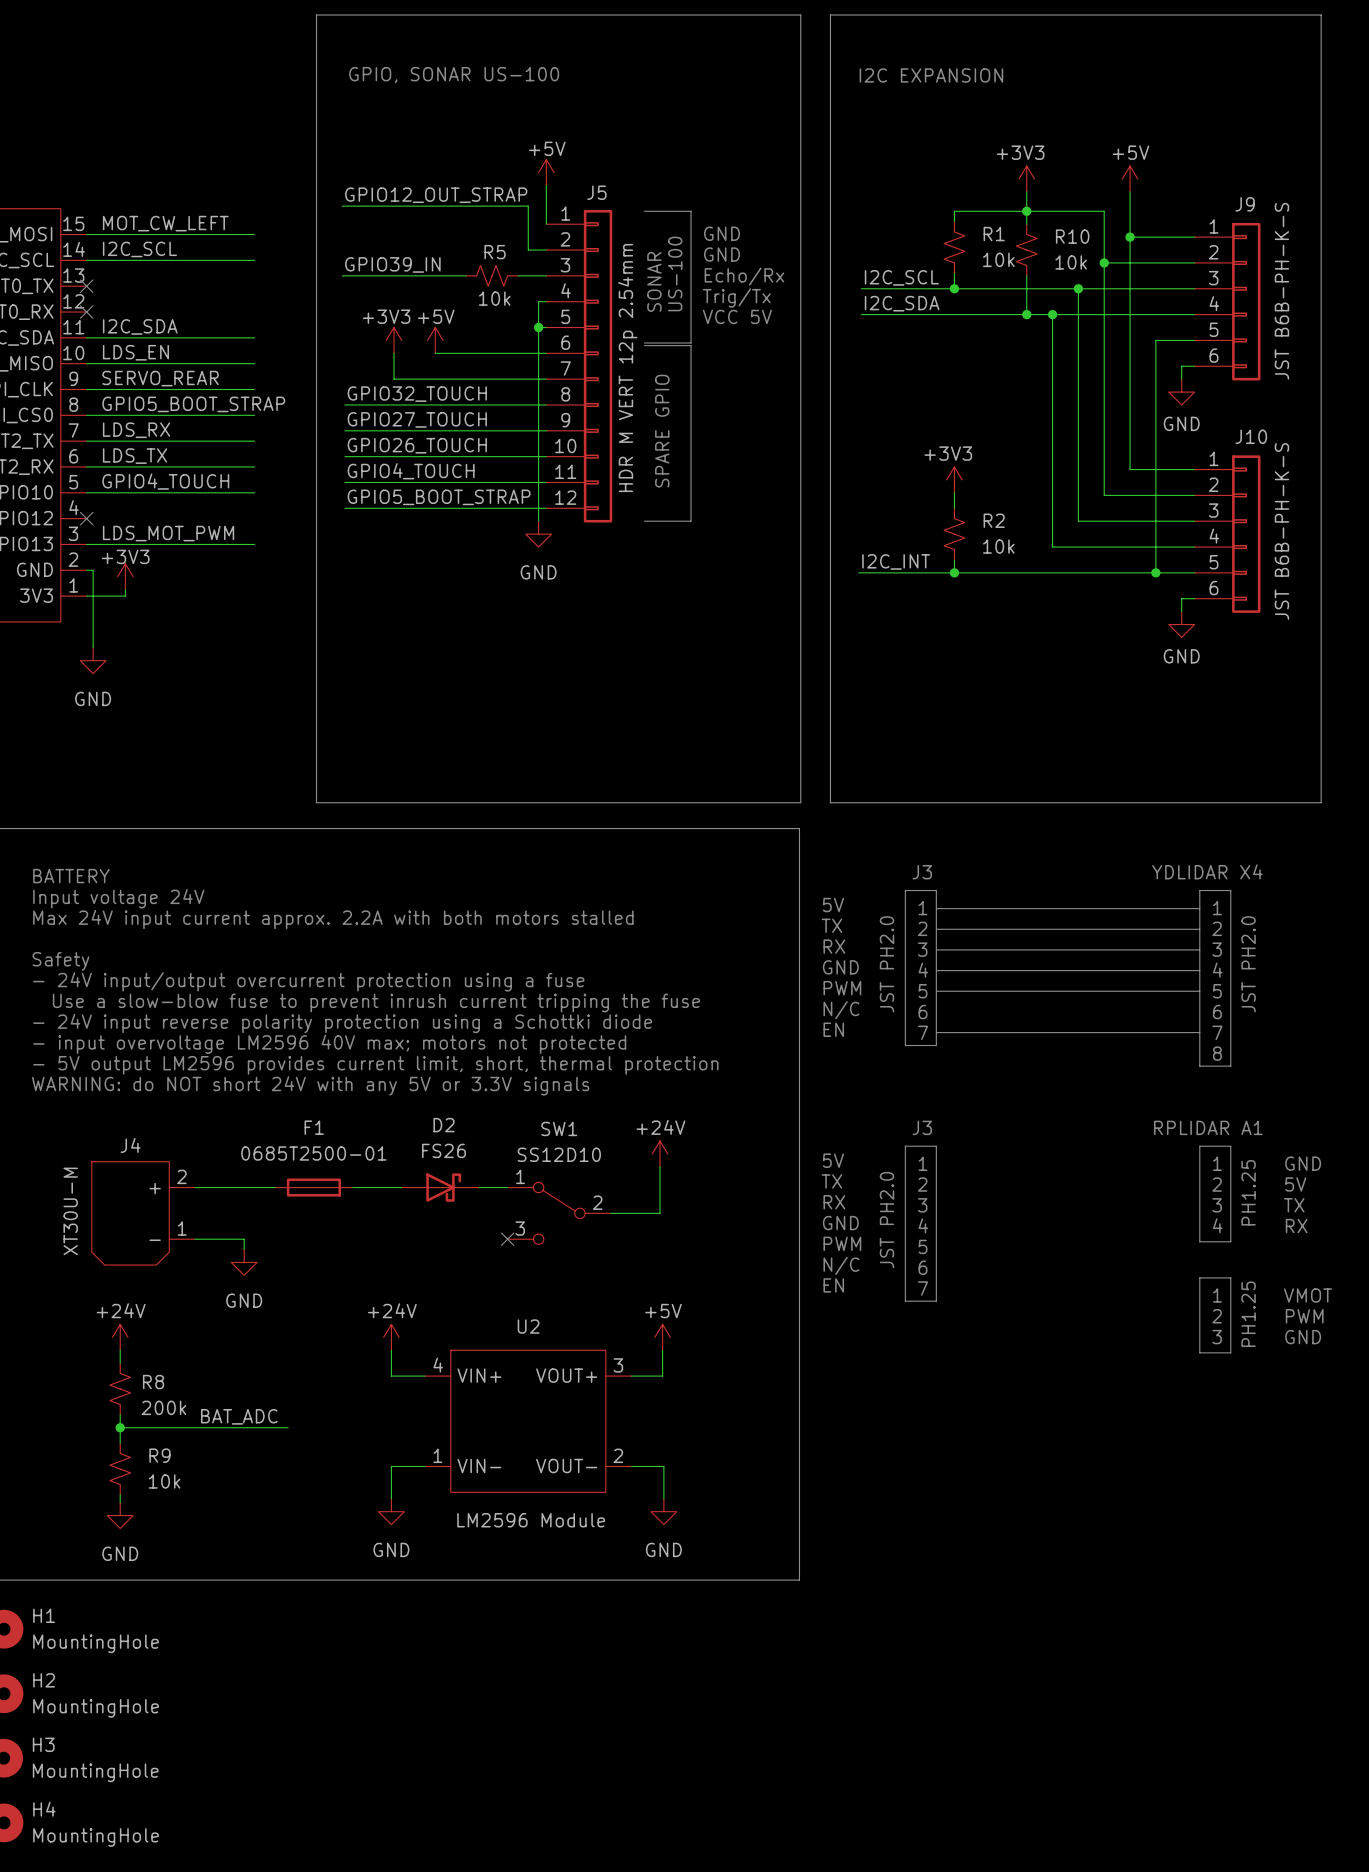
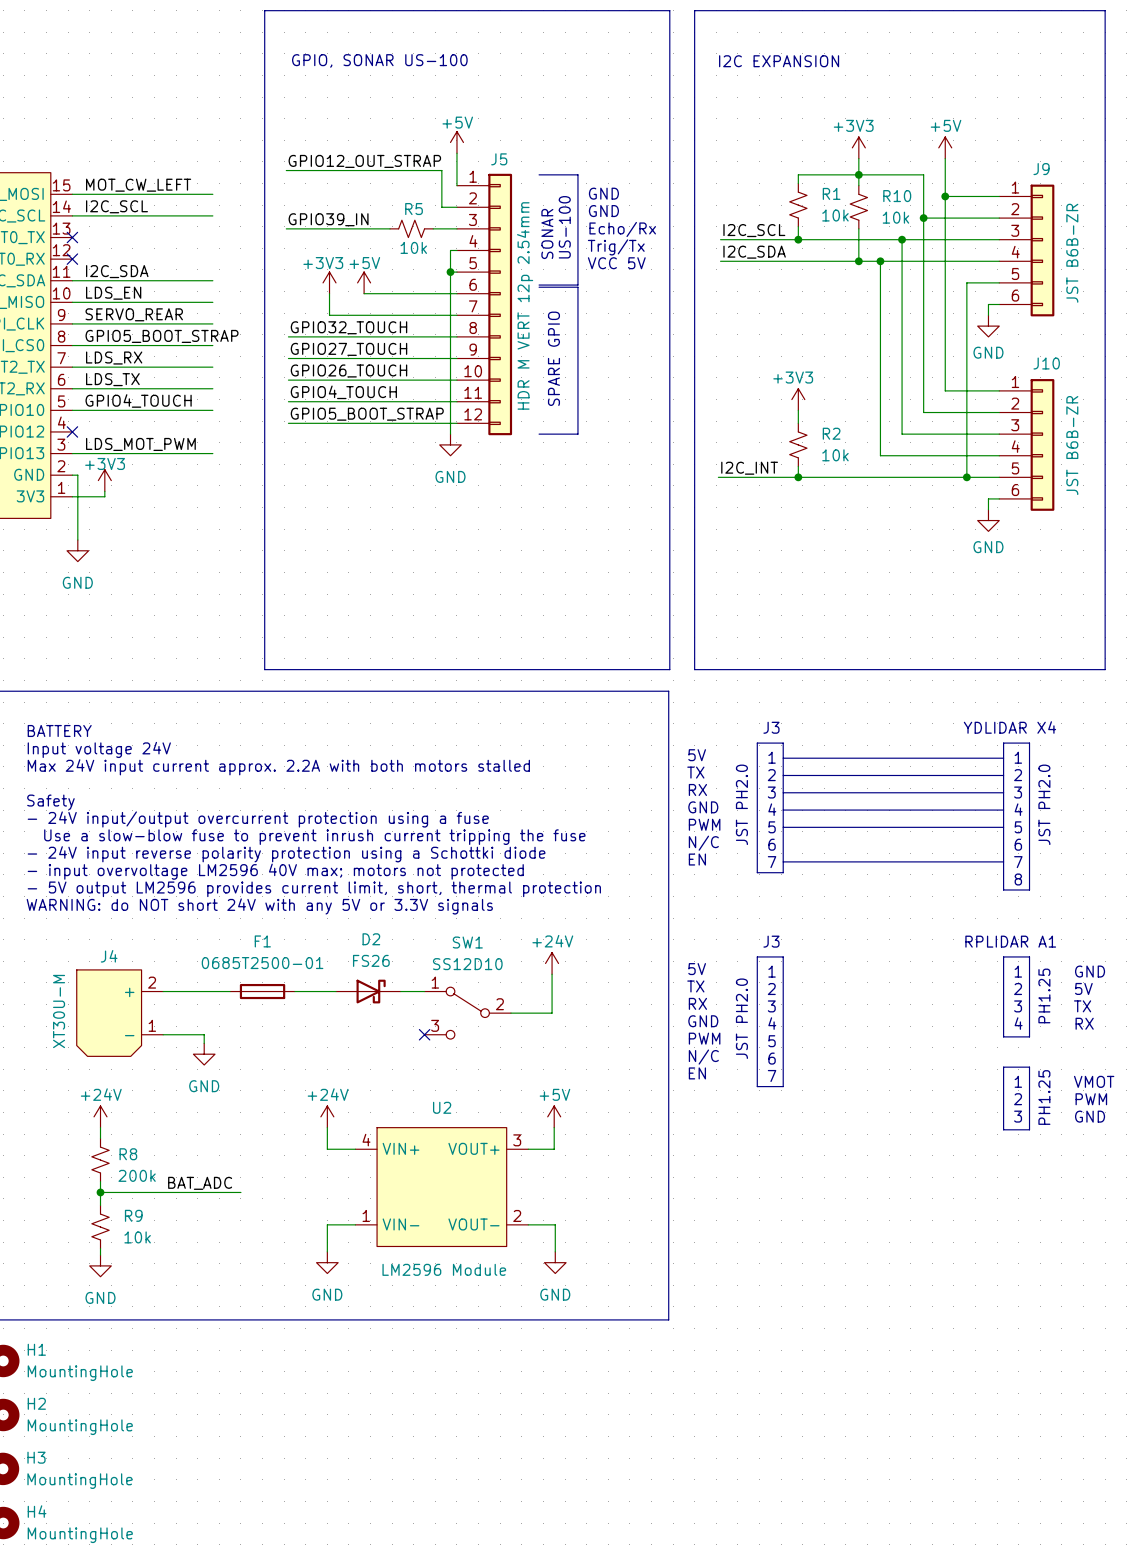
J9 value: JST B6B-PH-K-S (1281, 291) -> JST B6B-ZR (1072, 253)
J10 value: JST B6B-PH-K-S (1281, 531) -> JST B6B-ZR (1072, 445)

